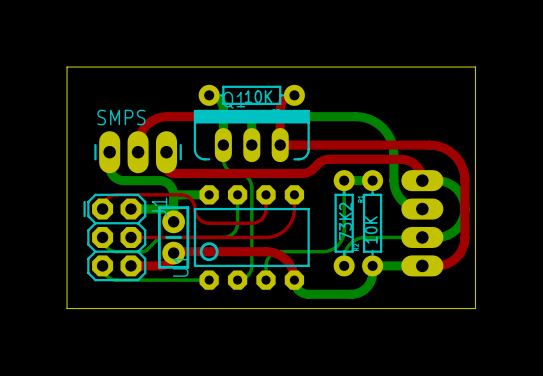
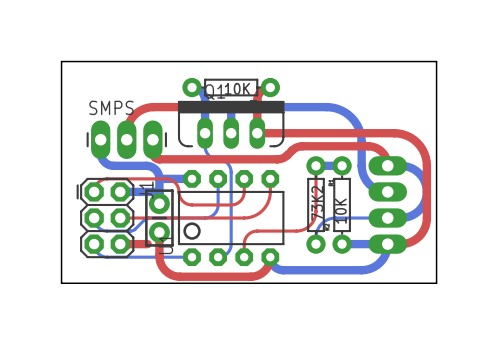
bottom track: (344, 180) (343, 233) (339, 243) (333, 248) (325, 251) (280, 251) (273, 253) (266, 262) (266, 280) -> none
top track: none -> (315, 165) (315, 214) (311, 223) (298, 230) (250, 232) (244, 240) (244, 257)
top track: (160, 265) (169, 262) (173, 251) (269, 251) (280, 255) (288, 262) (294, 280) -> (159, 232) (160, 264) (165, 270) (174, 276) (253, 276) (266, 269) (270, 257)
bottom track: (372, 265) (371, 278) (368, 285) (361, 291) (351, 294) -> (387, 244) (384, 257) (371, 268) (361, 270) (322, 270)

